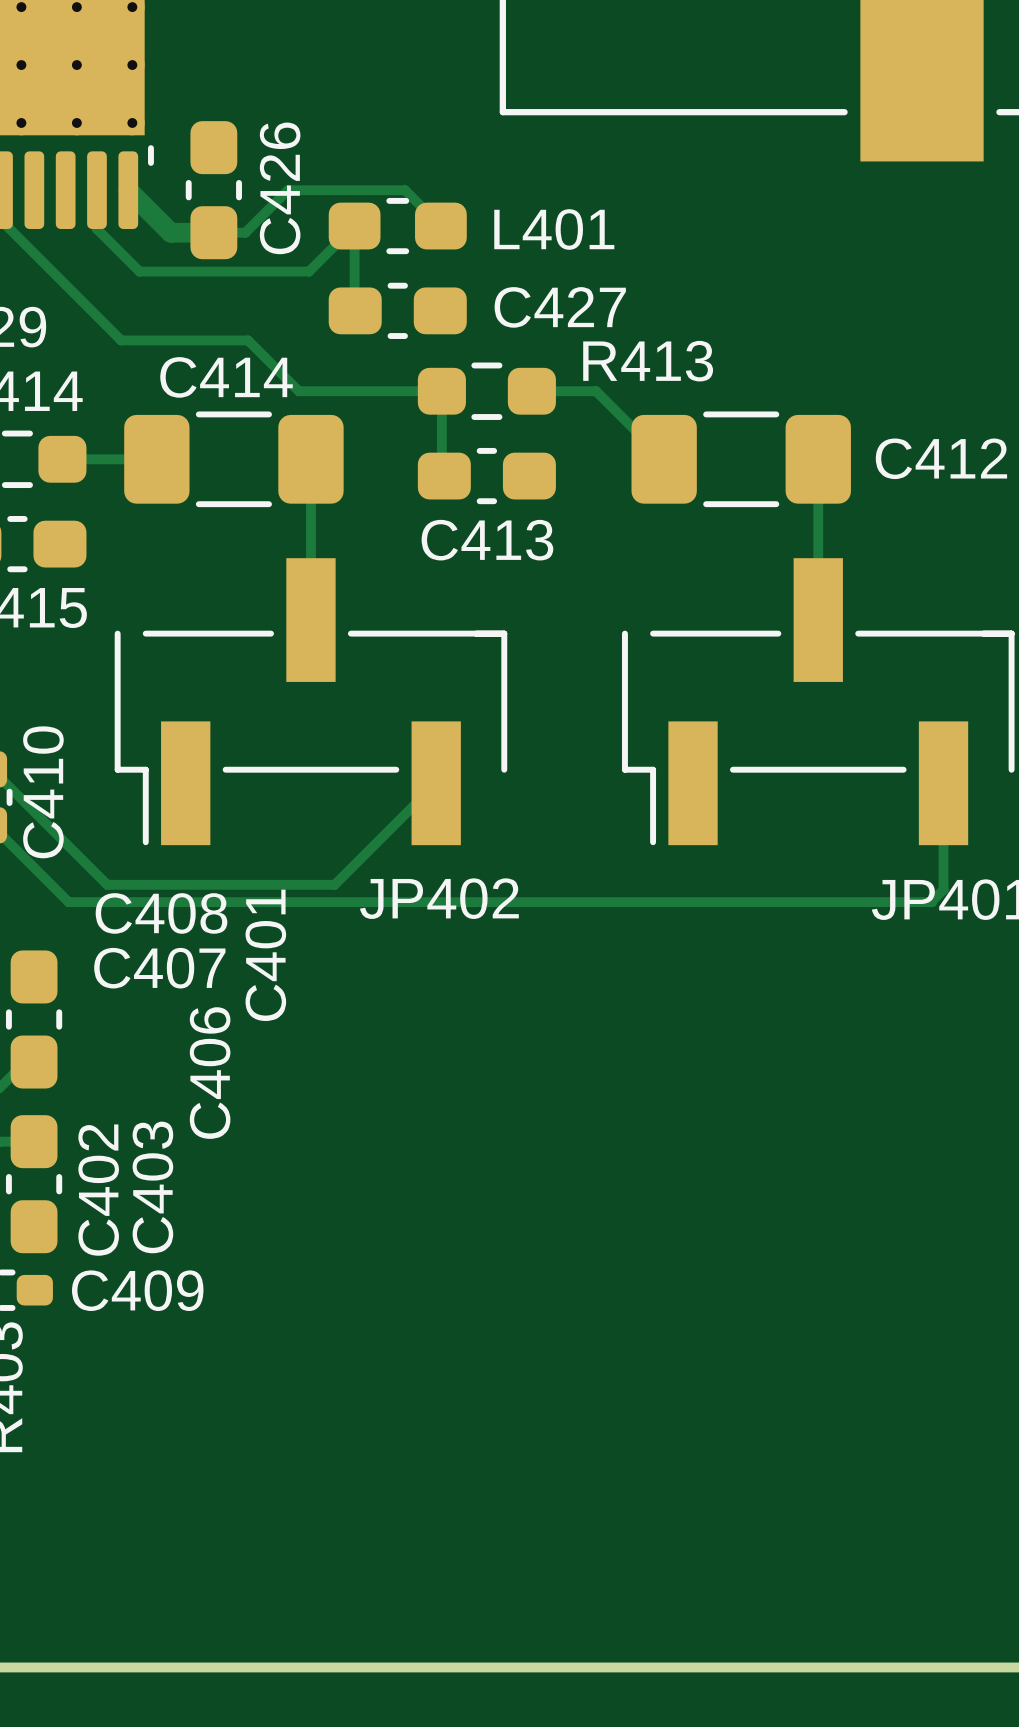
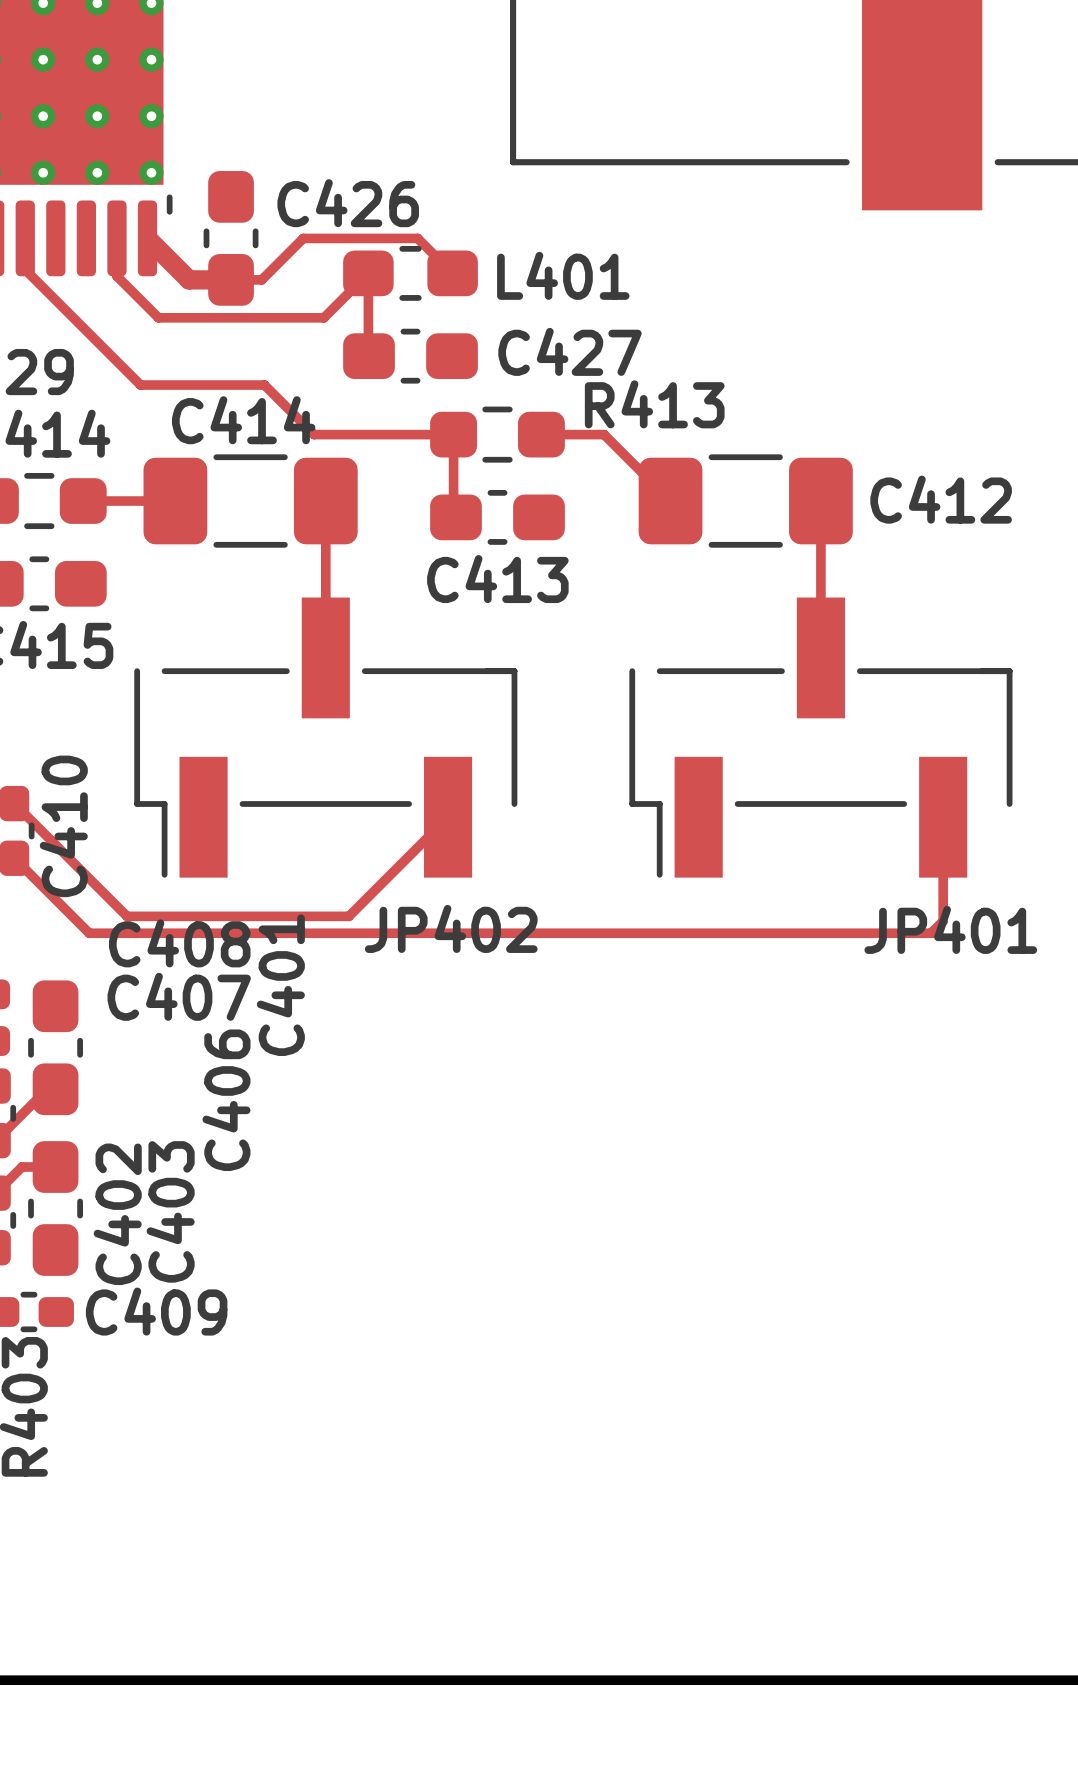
C426 name rotation: 0° (280, 188) -> 90° clockwise (348, 203)

